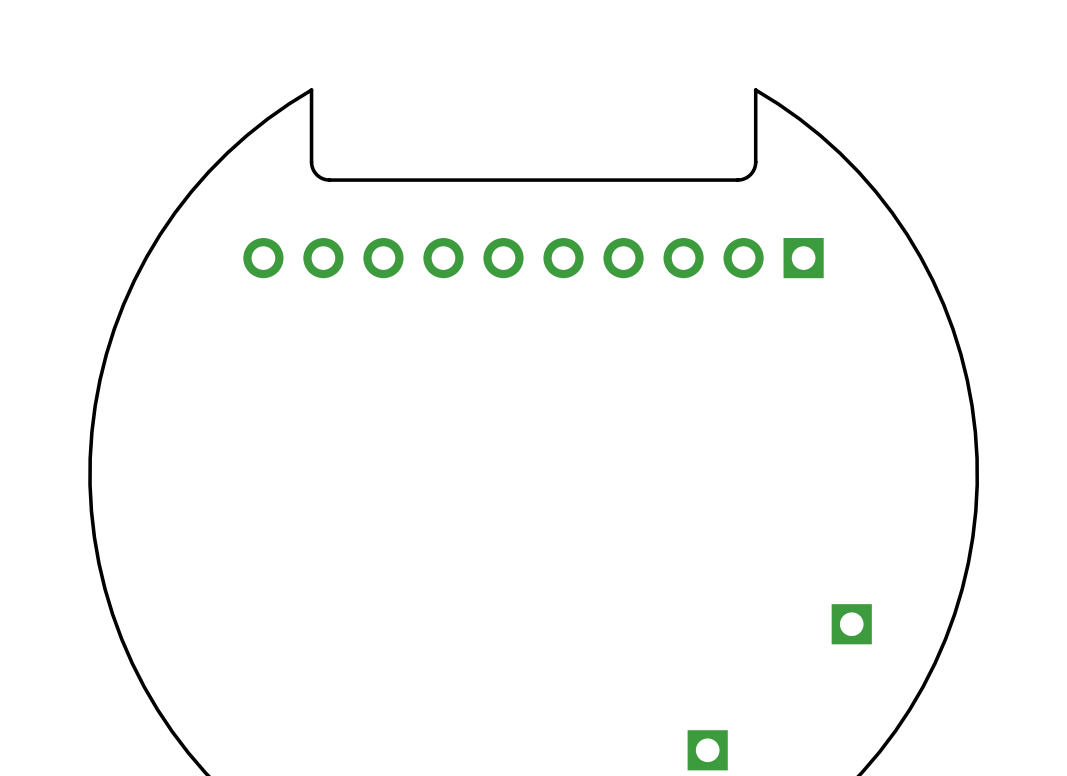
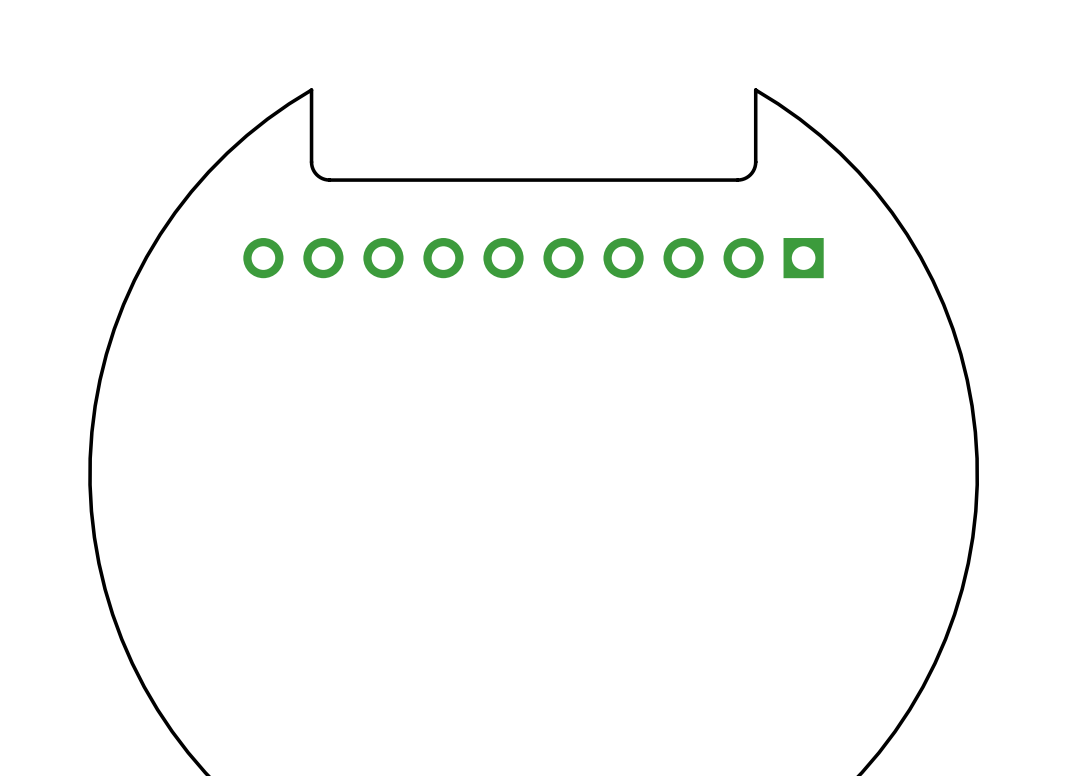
part: (851, 624) -> none
part: (707, 750) -> none

